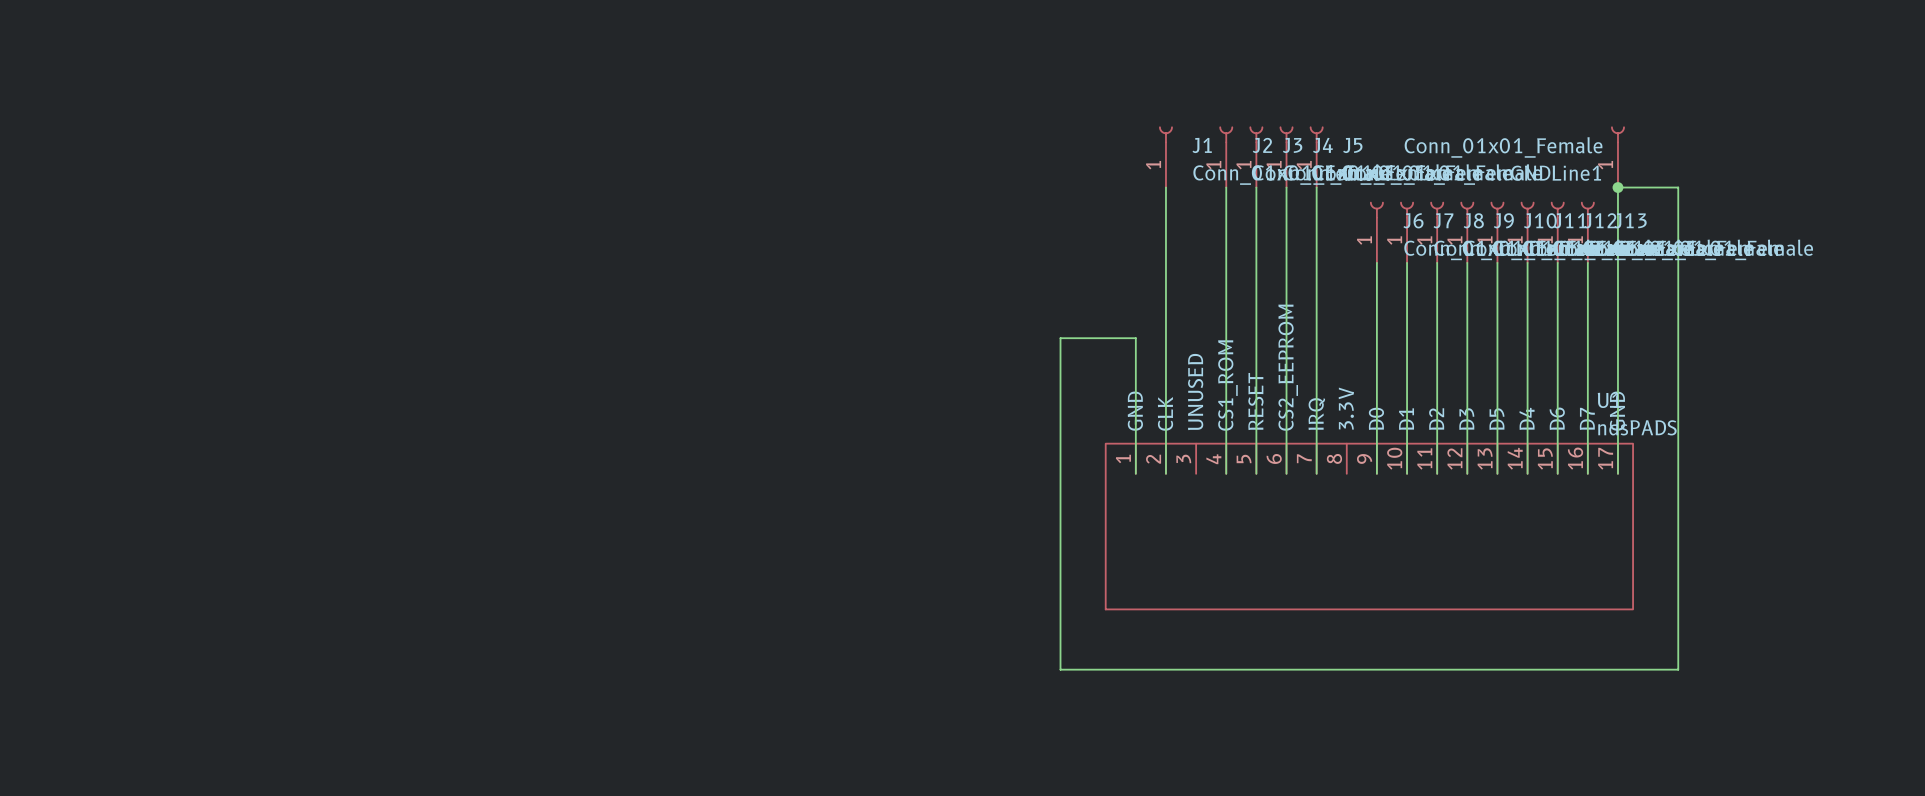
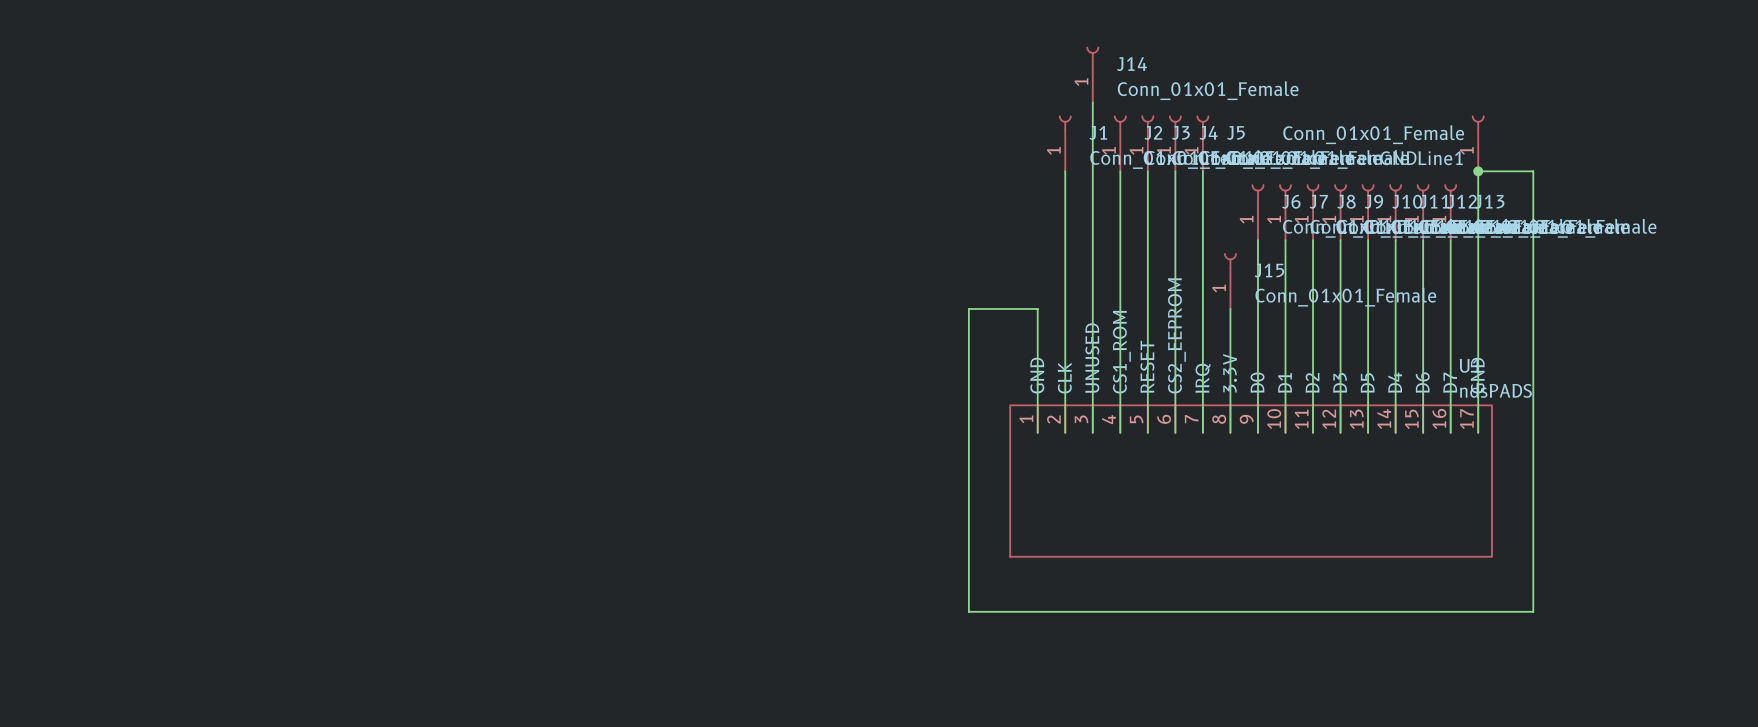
J14: none -> Conn_01x01_Female (1092, 74)
wire: none -> (1092, 102) (1092, 432)
J15: none -> Conn_01x01_Female (1230, 281)
wire: none -> (1230, 308) (1230, 432)

